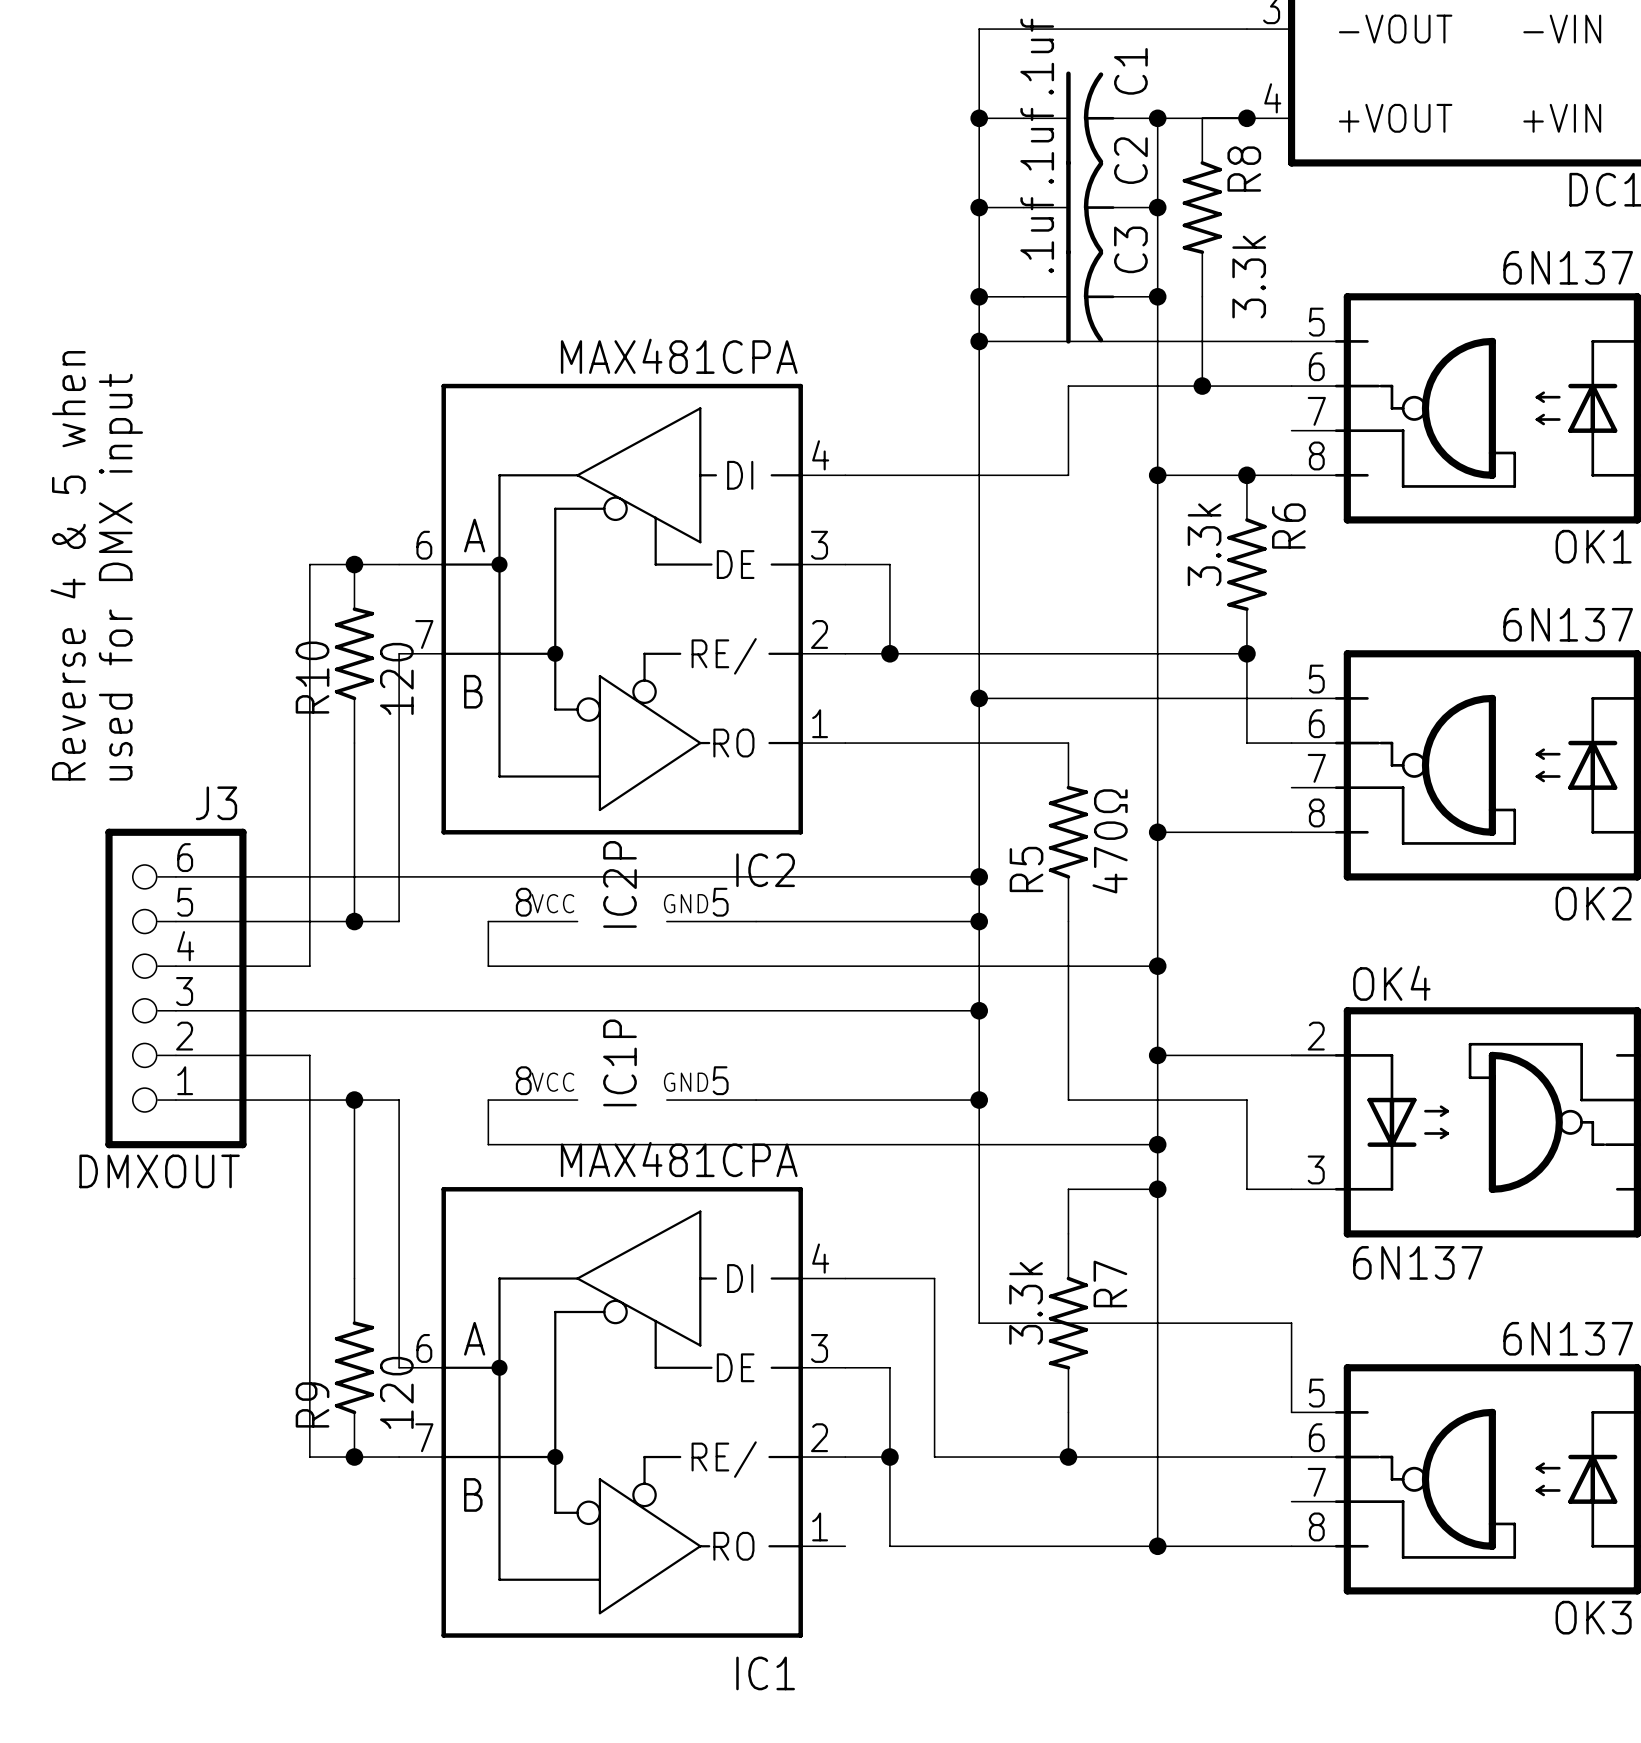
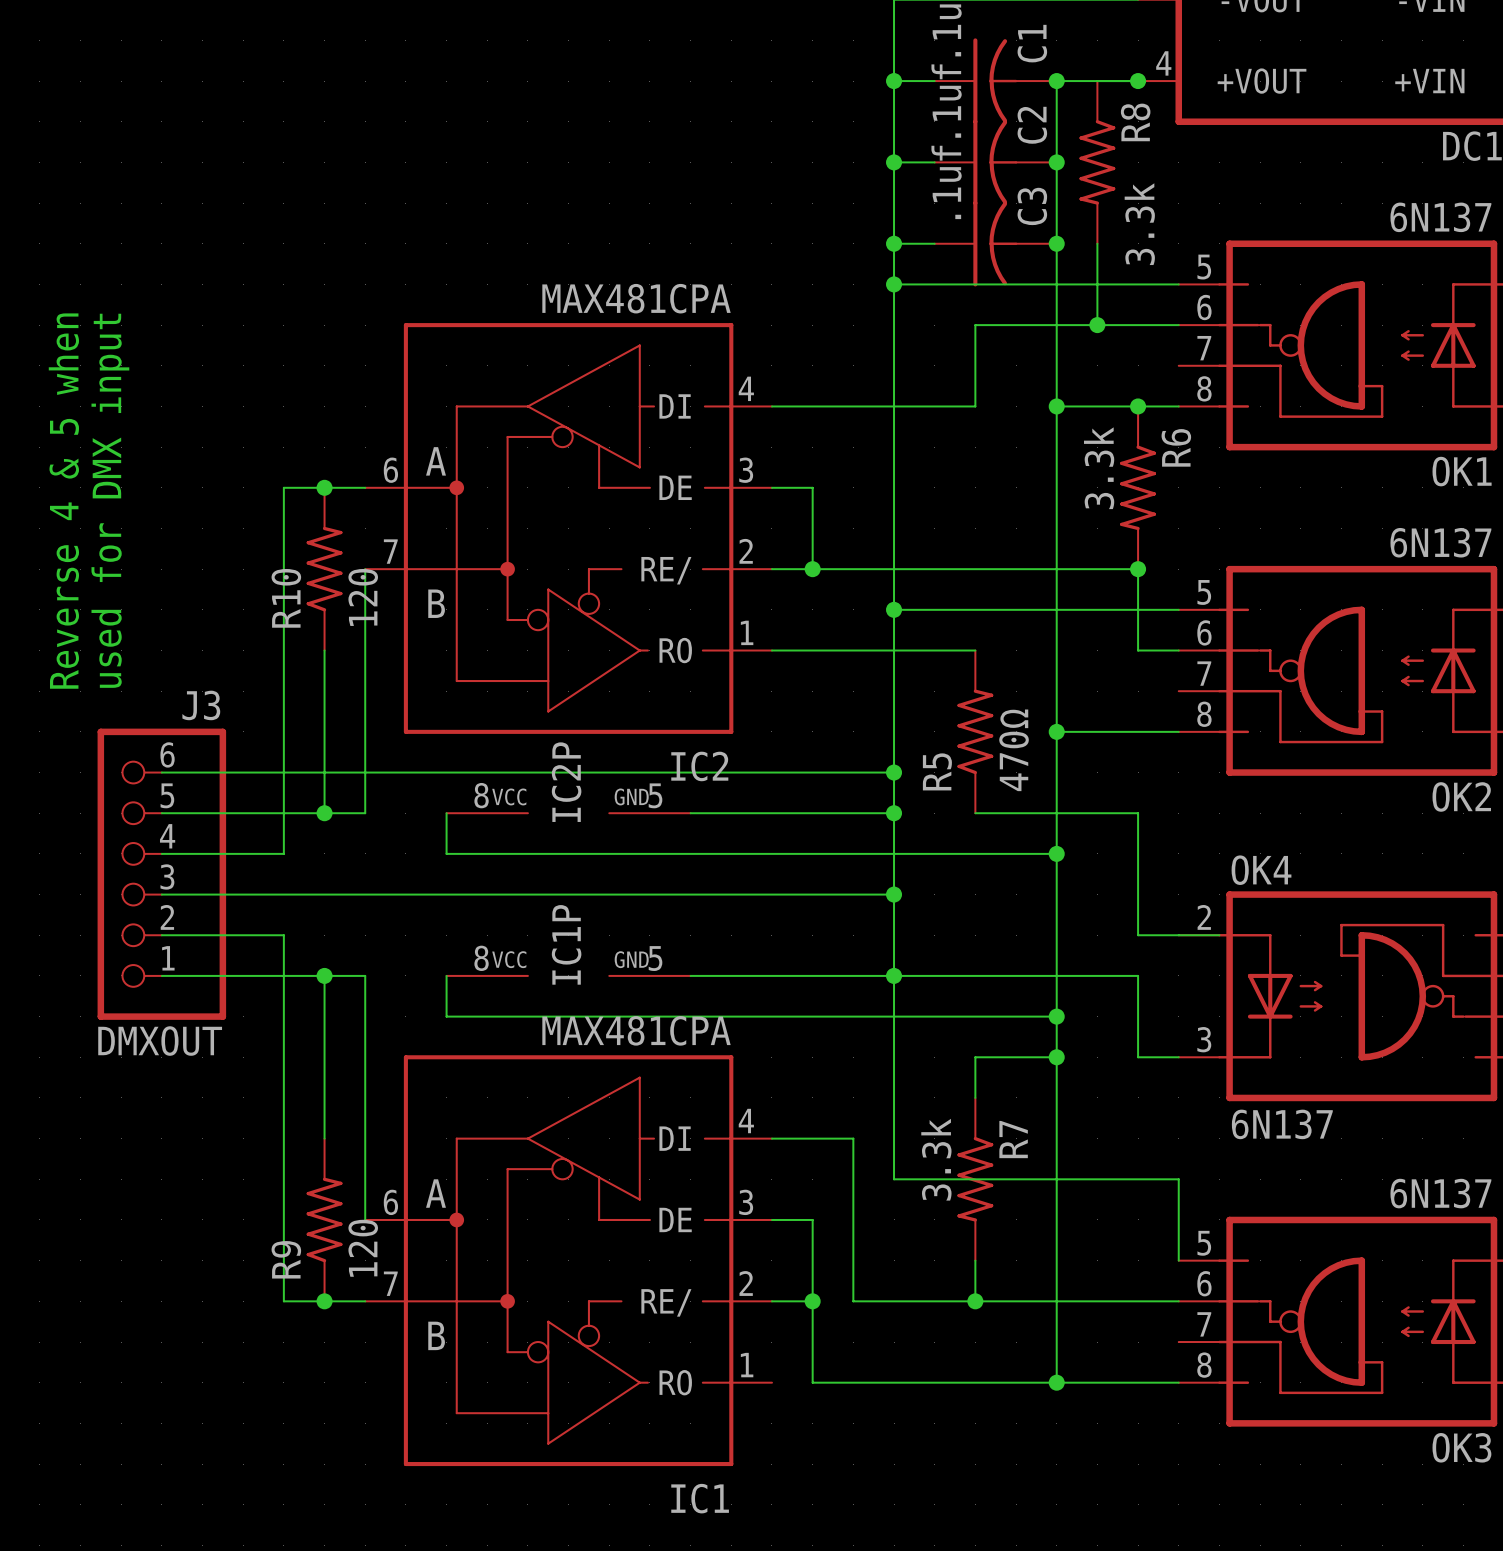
wire: (1068, 921) (1068, 1100) -> (894, 975) (975, 975)
wire: (1157, 1055) (1246, 1055) -> (975, 813) (1138, 813) (1138, 935)
junction: (1157, 1055) -> none

